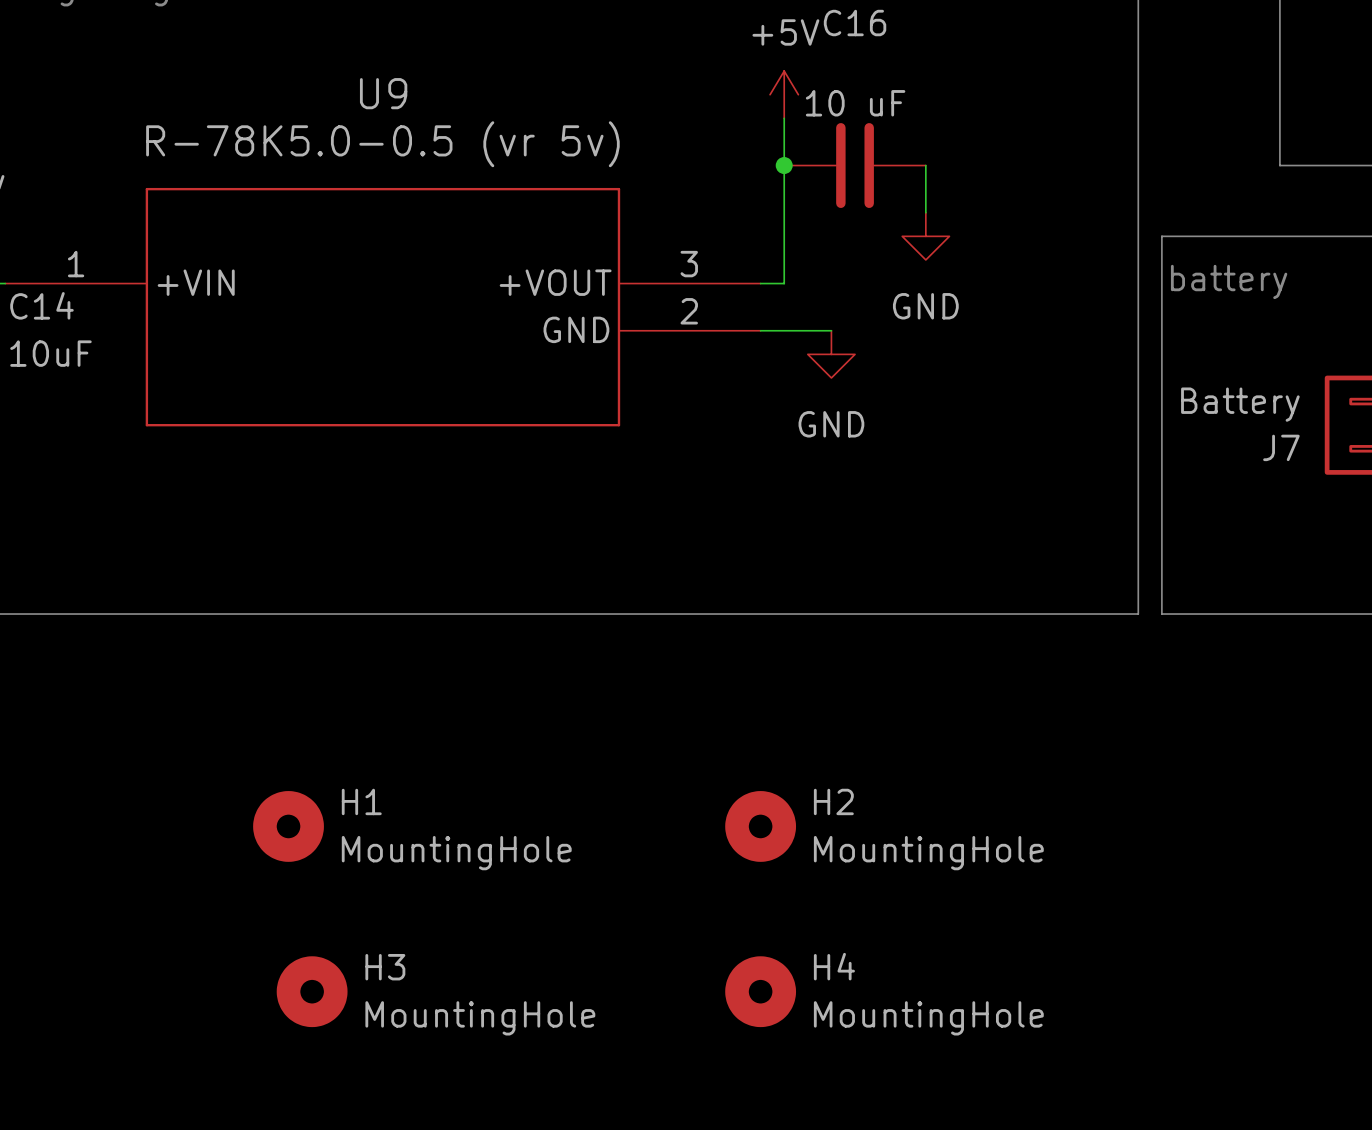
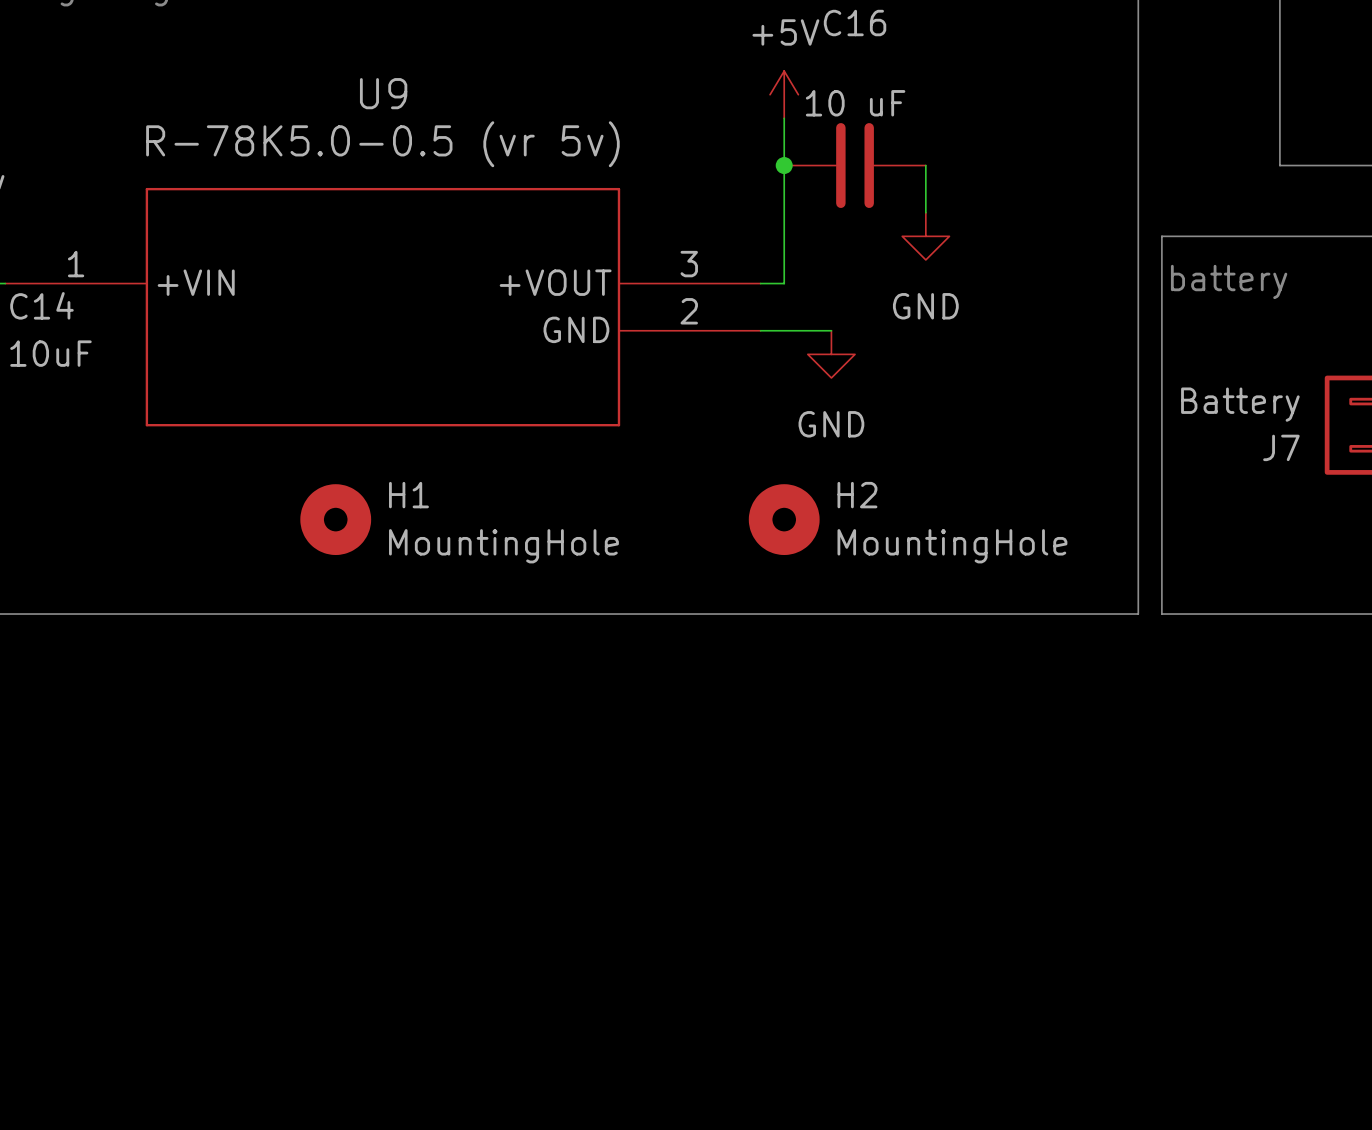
H1 position: (288, 826) -> (335, 519)
H2 position: (760, 826) -> (784, 519)
H3: MountingHole (312, 991) -> none
H4: MountingHole (760, 991) -> none

